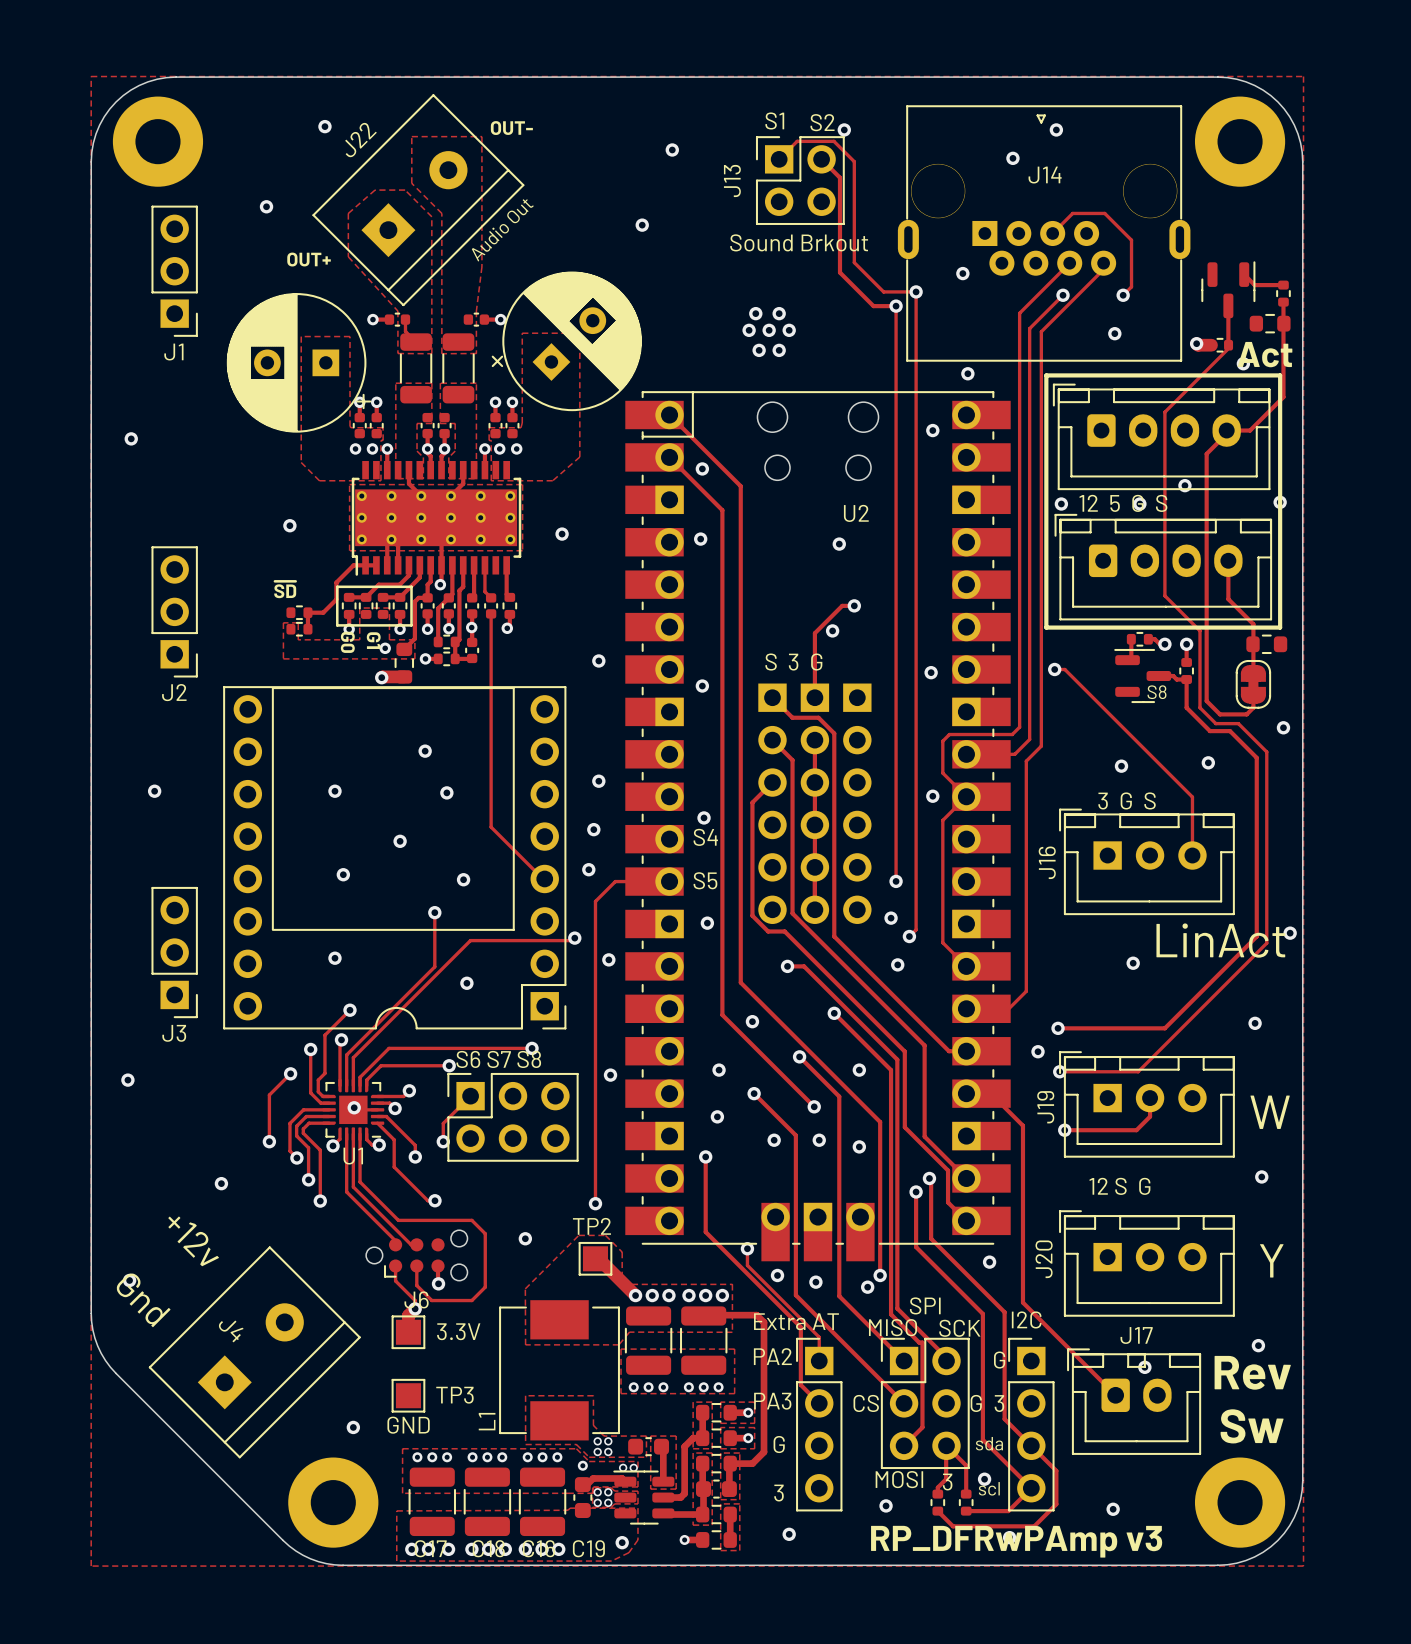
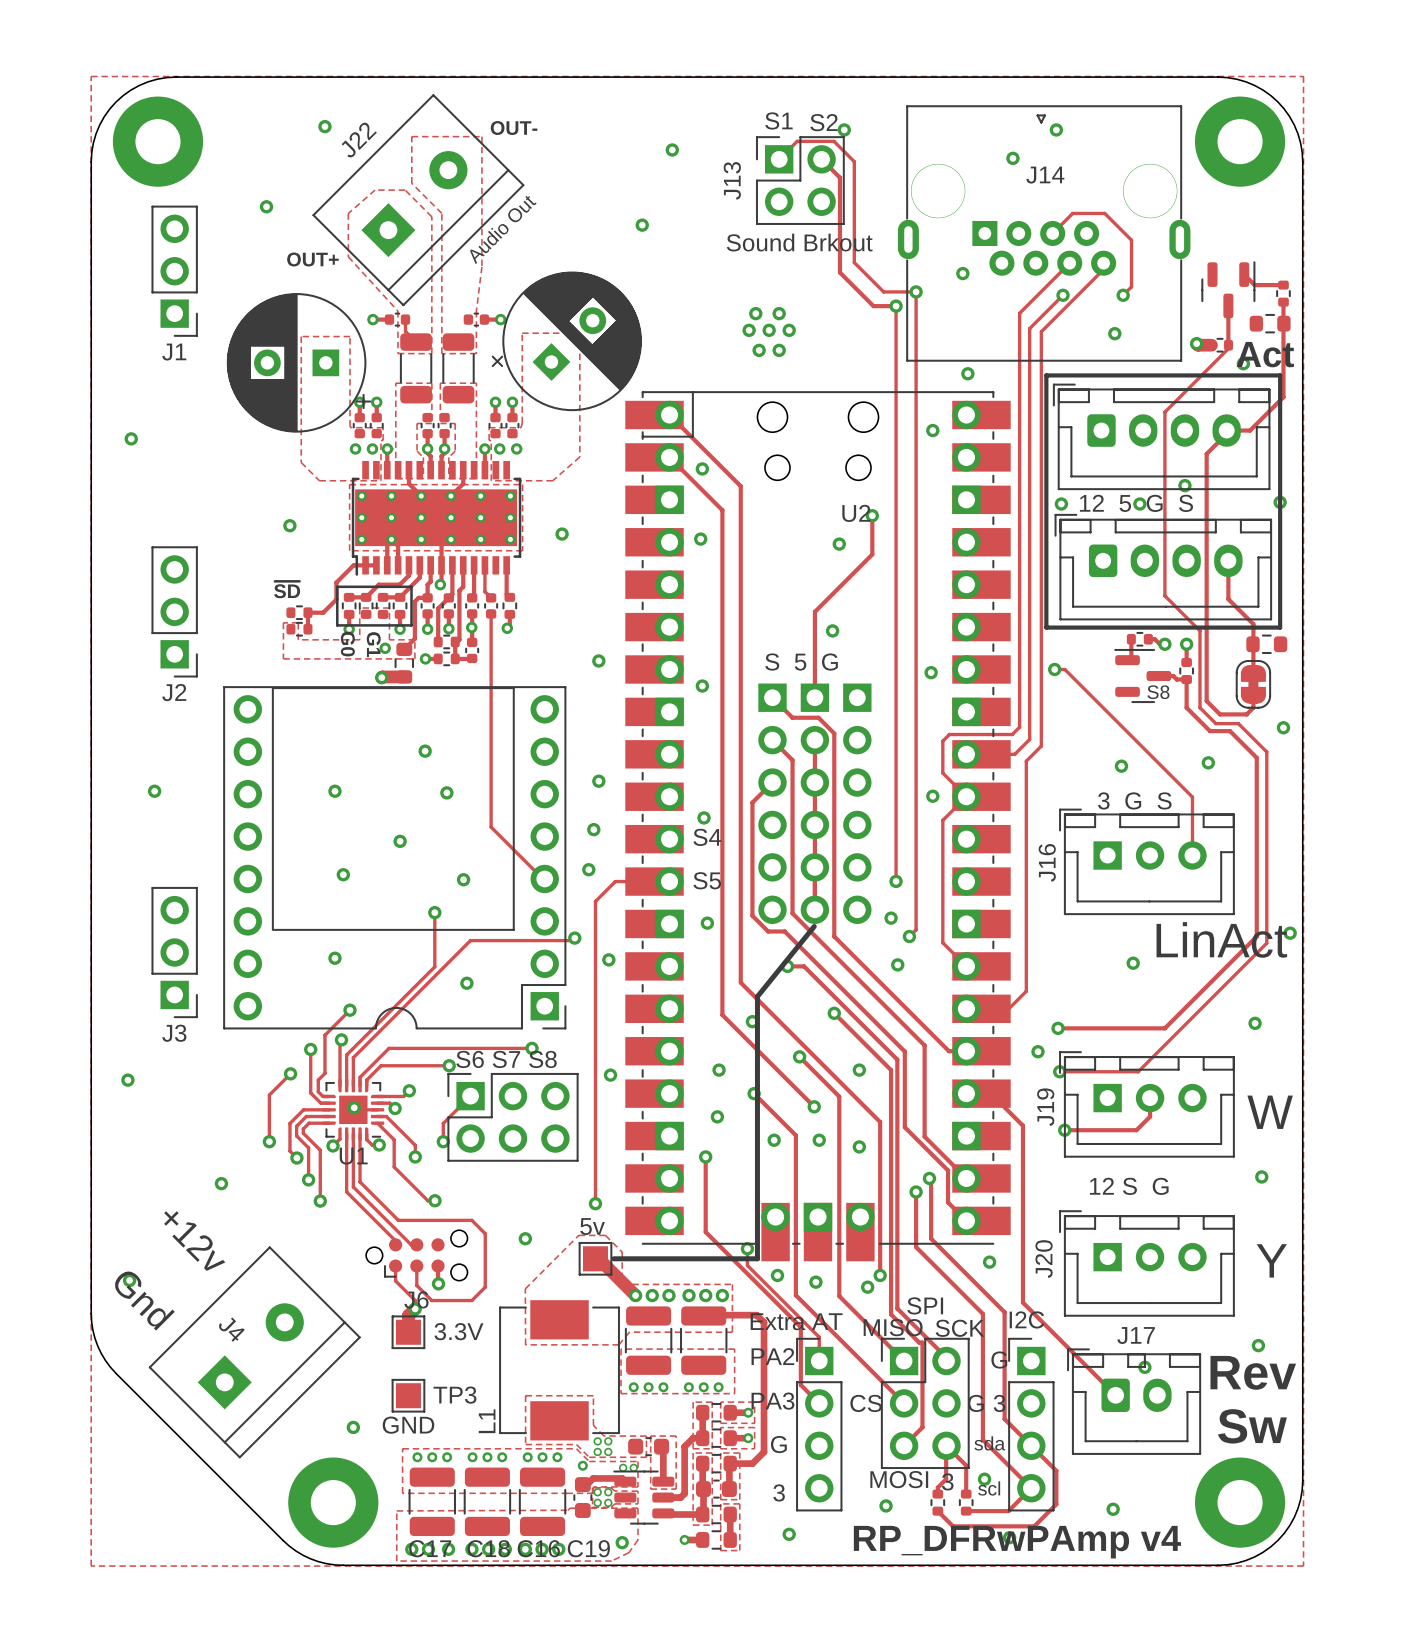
track: (854, 605) (842, 605) (814, 633) -> (872, 515) (872, 554) (814, 611) (814, 633)
via position: (854, 605) -> (872, 515)
text: S 3 G (793, 662) -> S 5 G (801, 662)
line: none -> (814, 926) (757, 996) (757, 1258) (613, 1258)
TP2 name: TP2 (591, 1226) -> 5v (592, 1226)
text: RP_DFRwPAmp v3 (1016, 1541) -> RP_DFRwPAmp v4 (1017, 1542)

